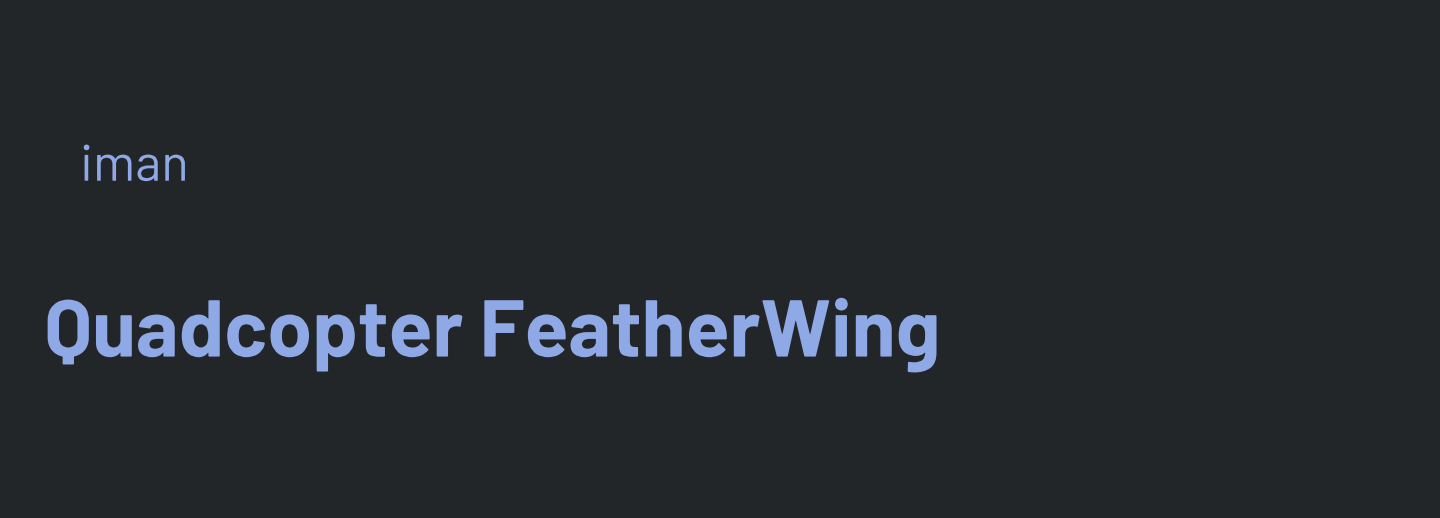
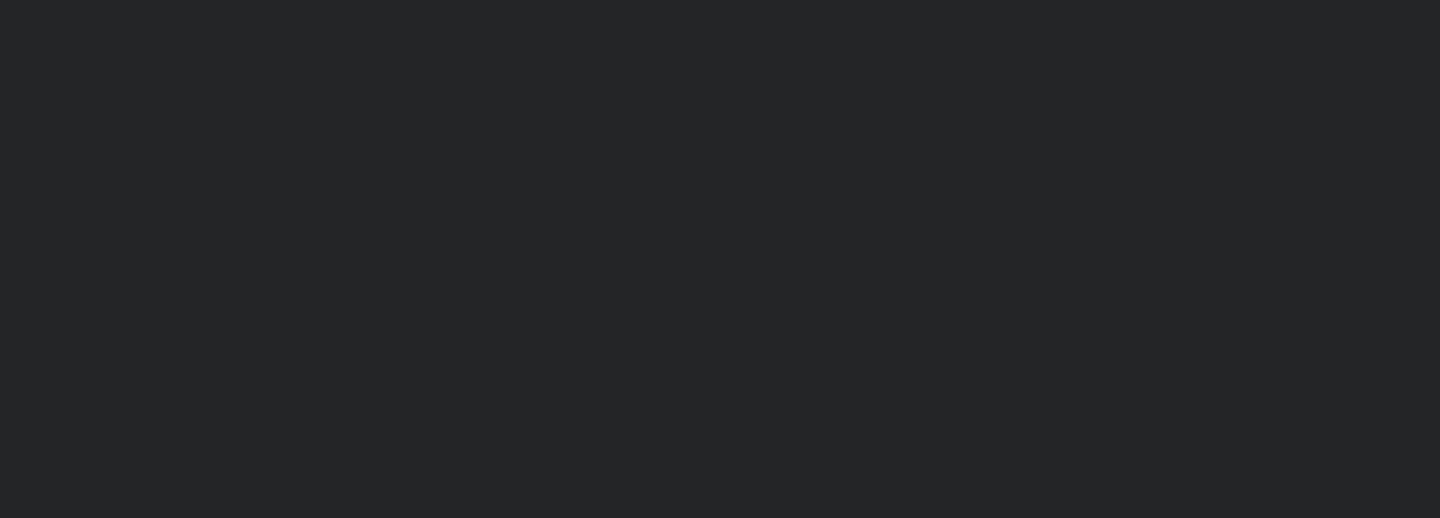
text: iman (134, 162) -> none
text: Quadcopter FeatherWing (492, 335) -> none

